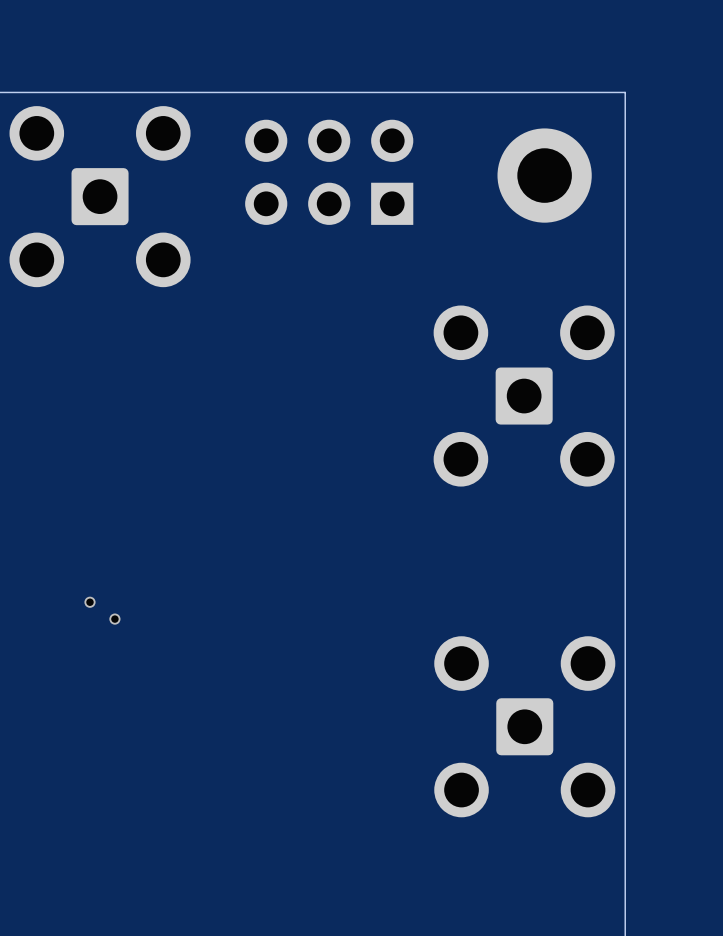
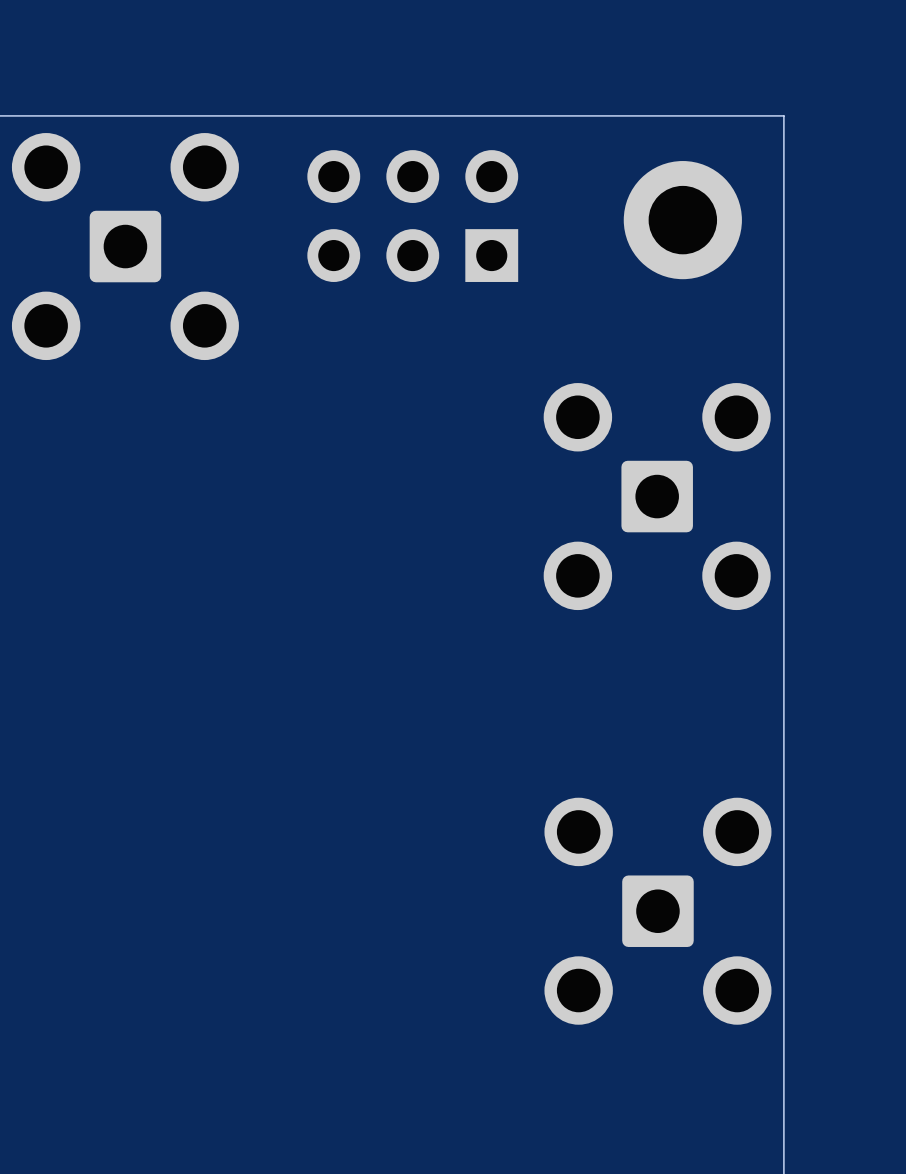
via: (90, 602) -> none
via: (114, 619) -> none

